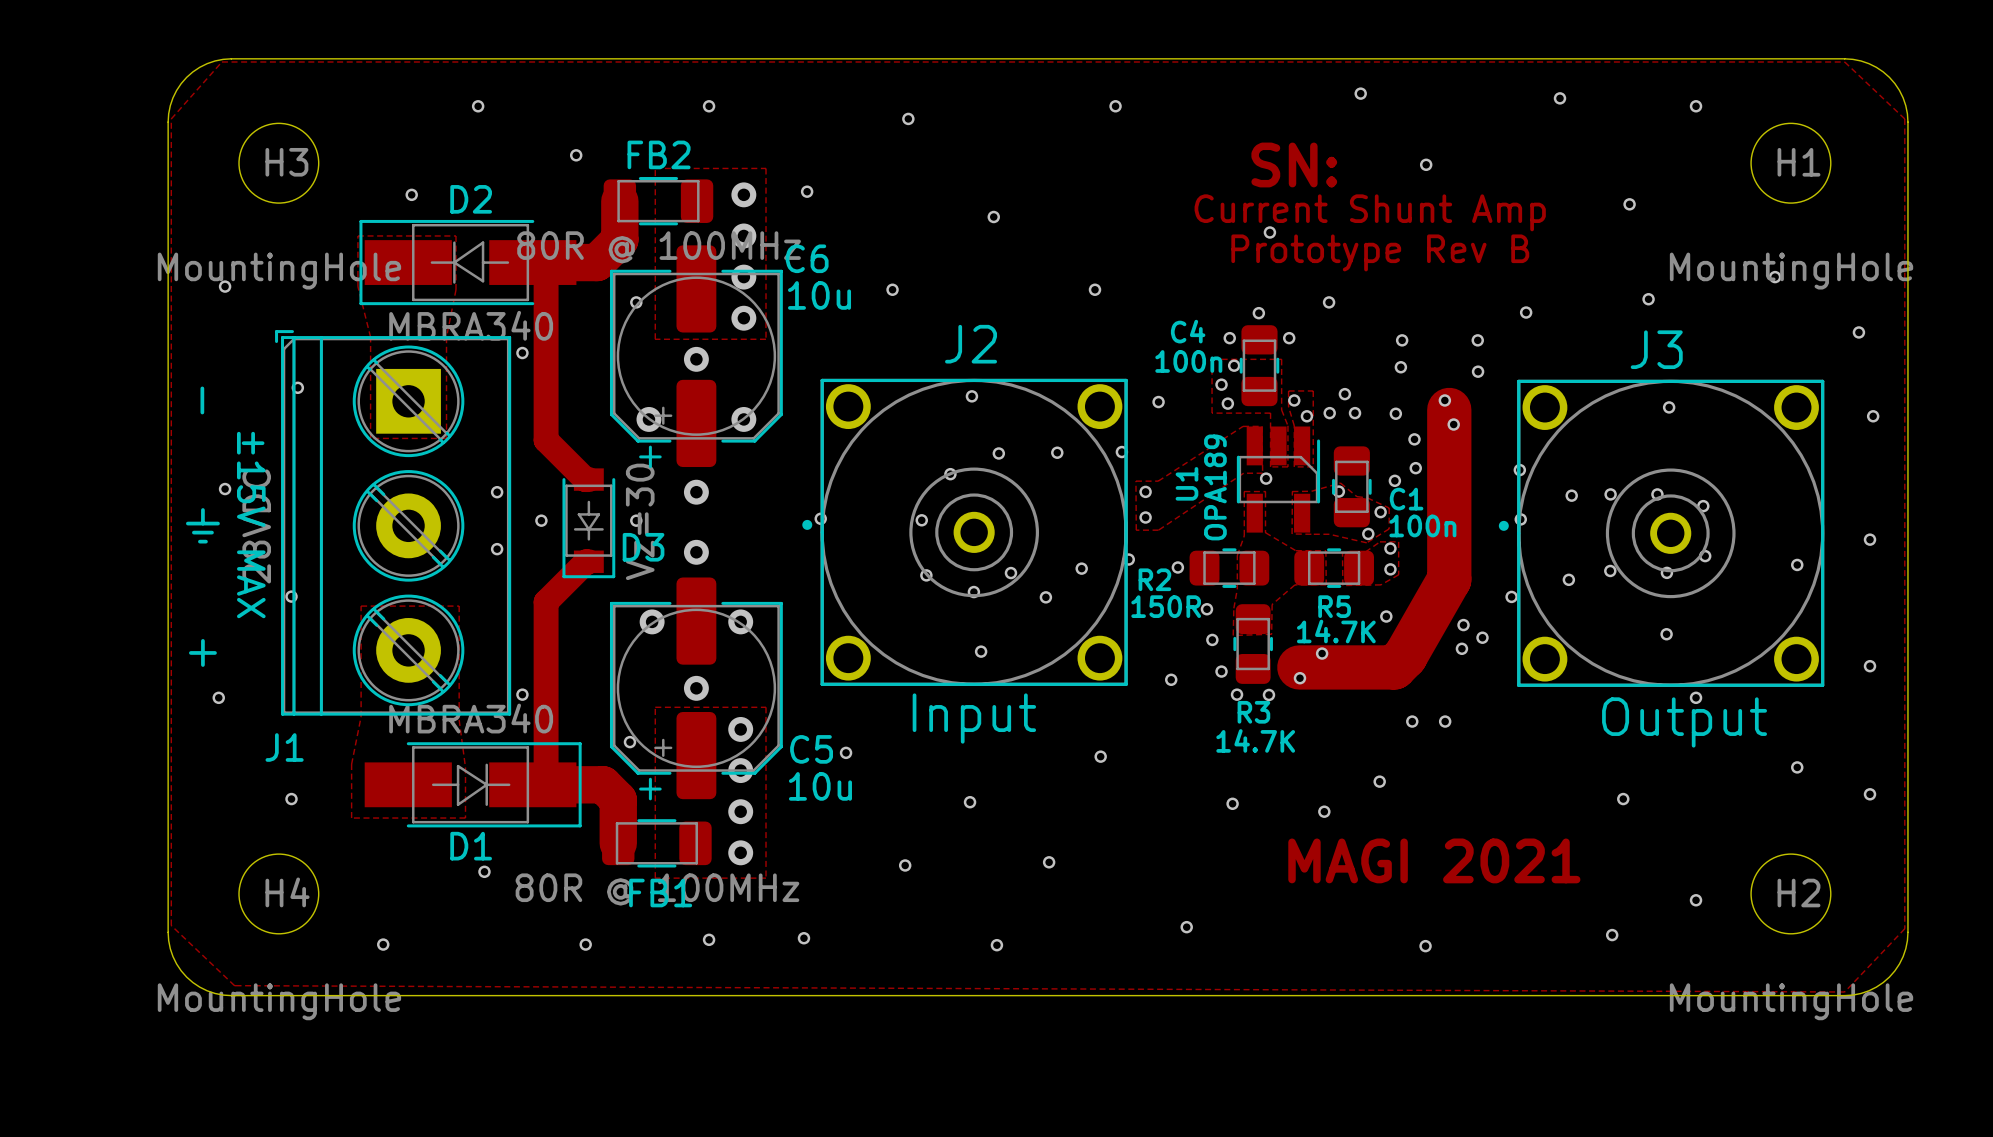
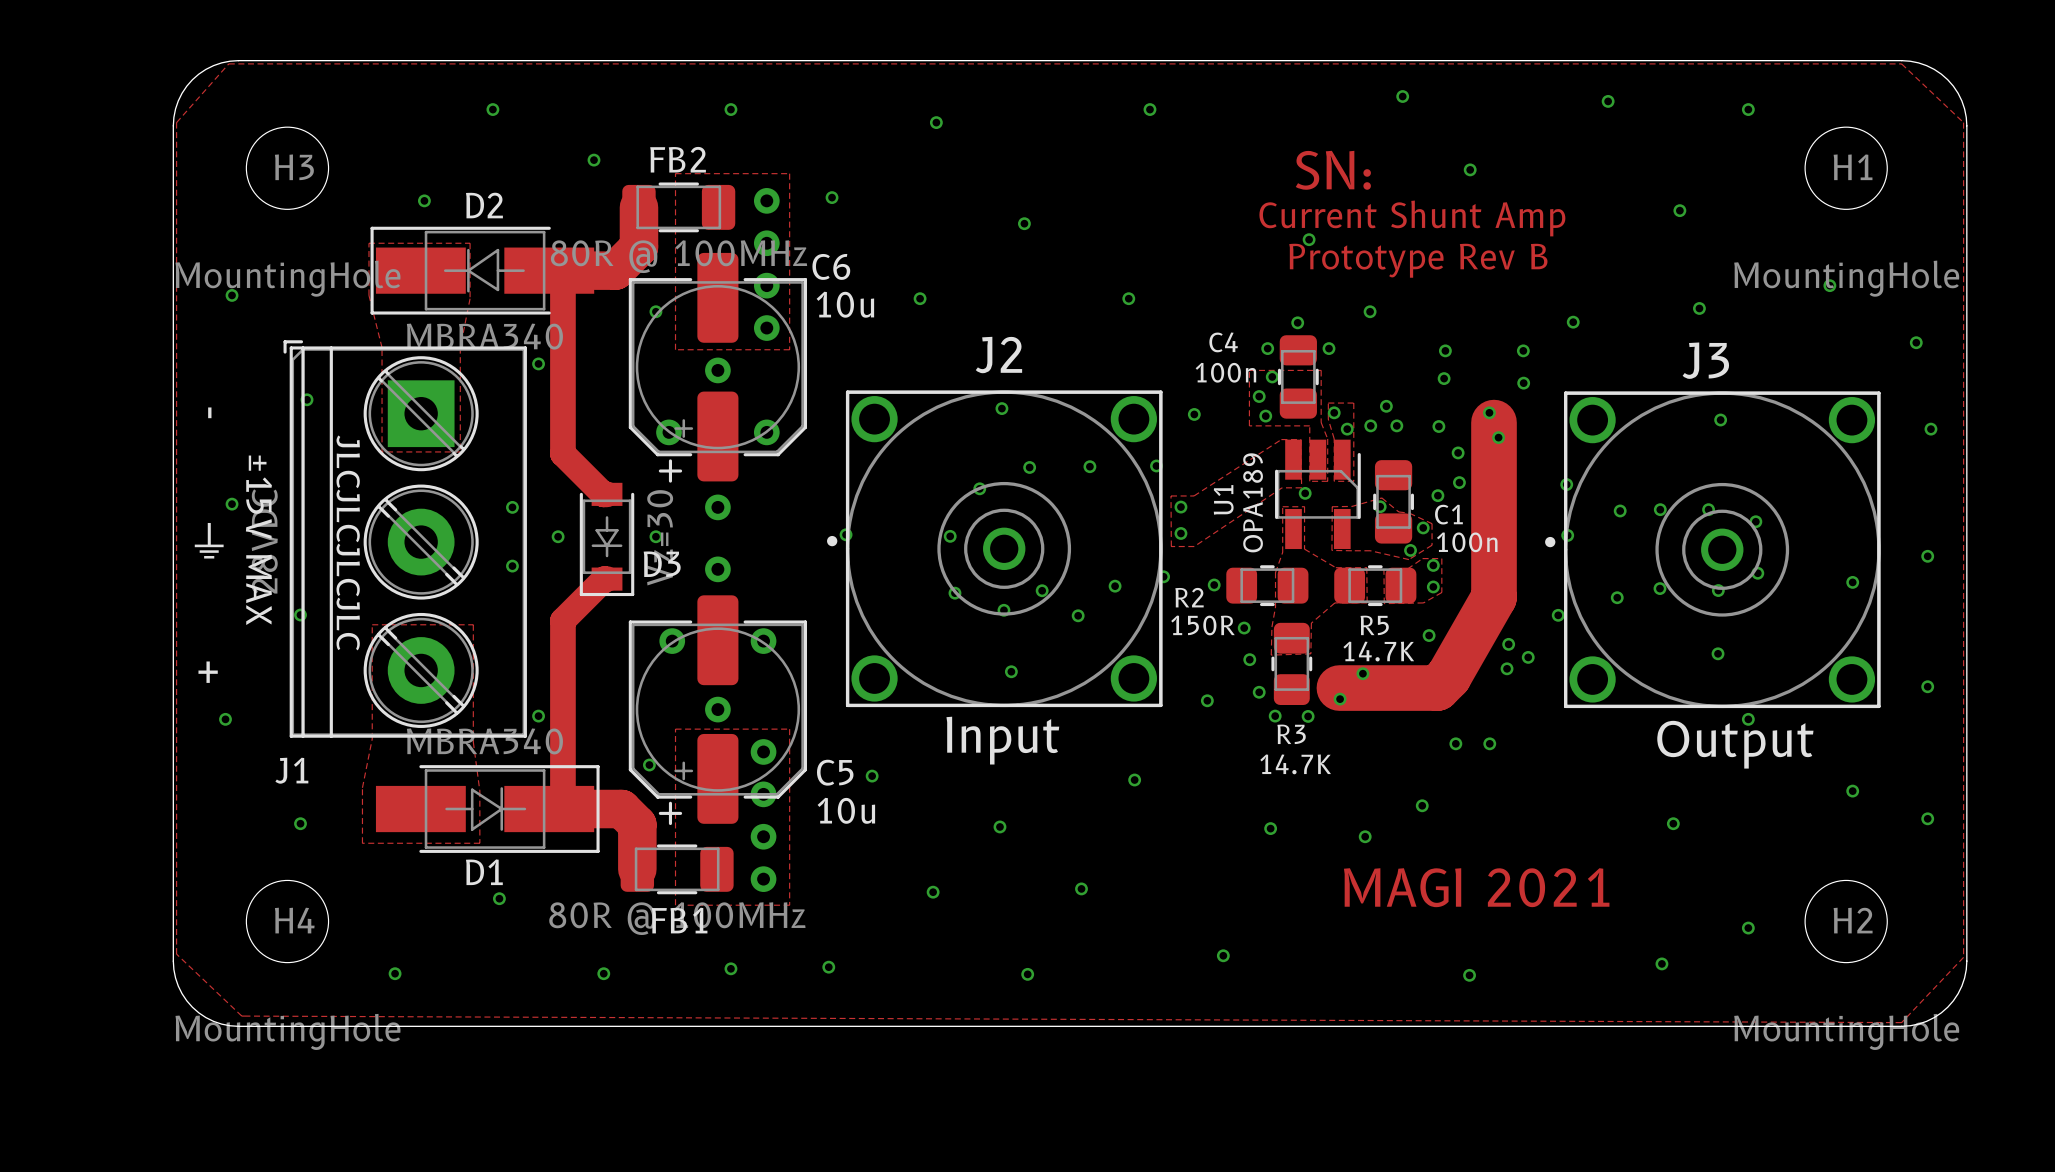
text: none -> JLCJLCJLCJLC (348, 542)

